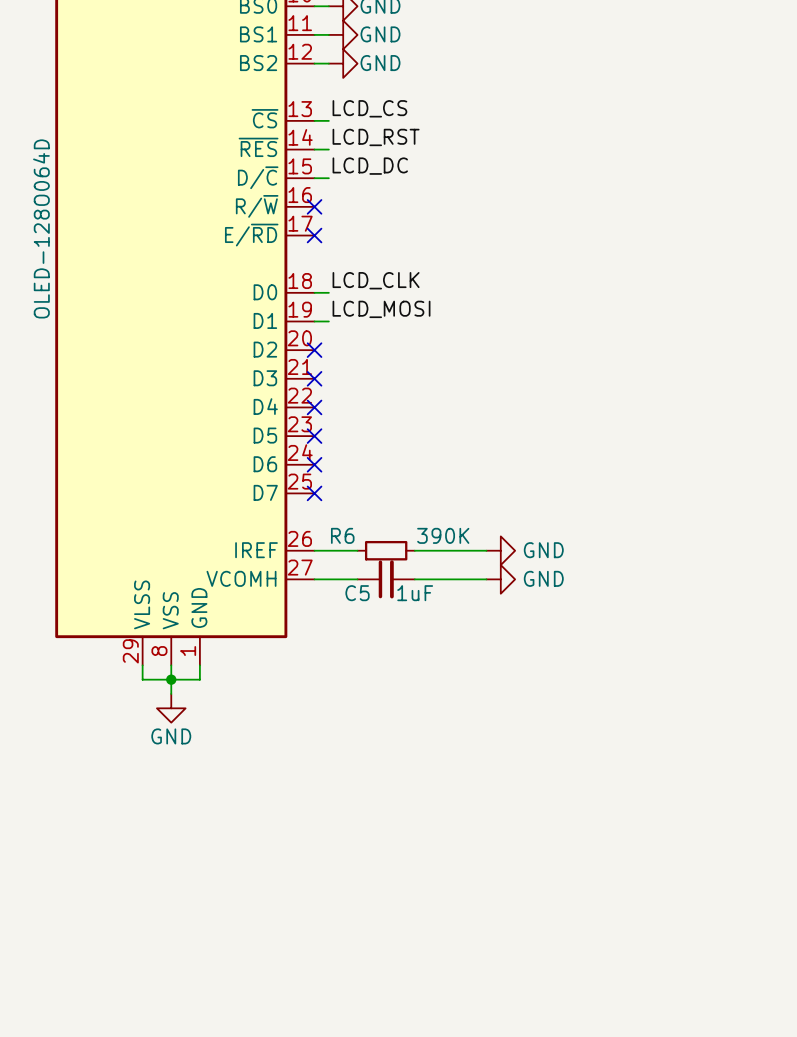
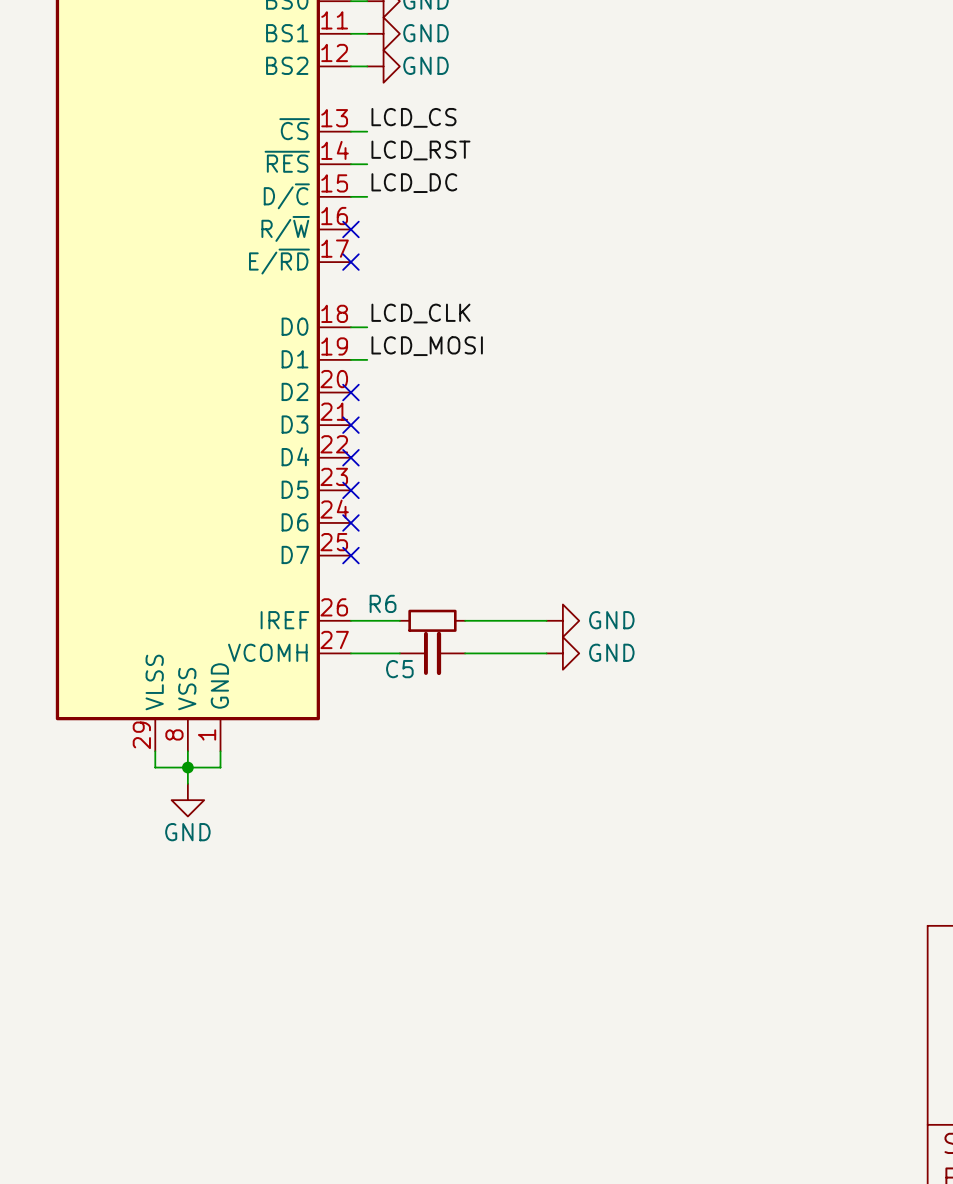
part value: OLED-128O064D (41, 228) -> none
R6 value: 390K (443, 535) -> none
C5 value: 1uF (415, 593) -> none

